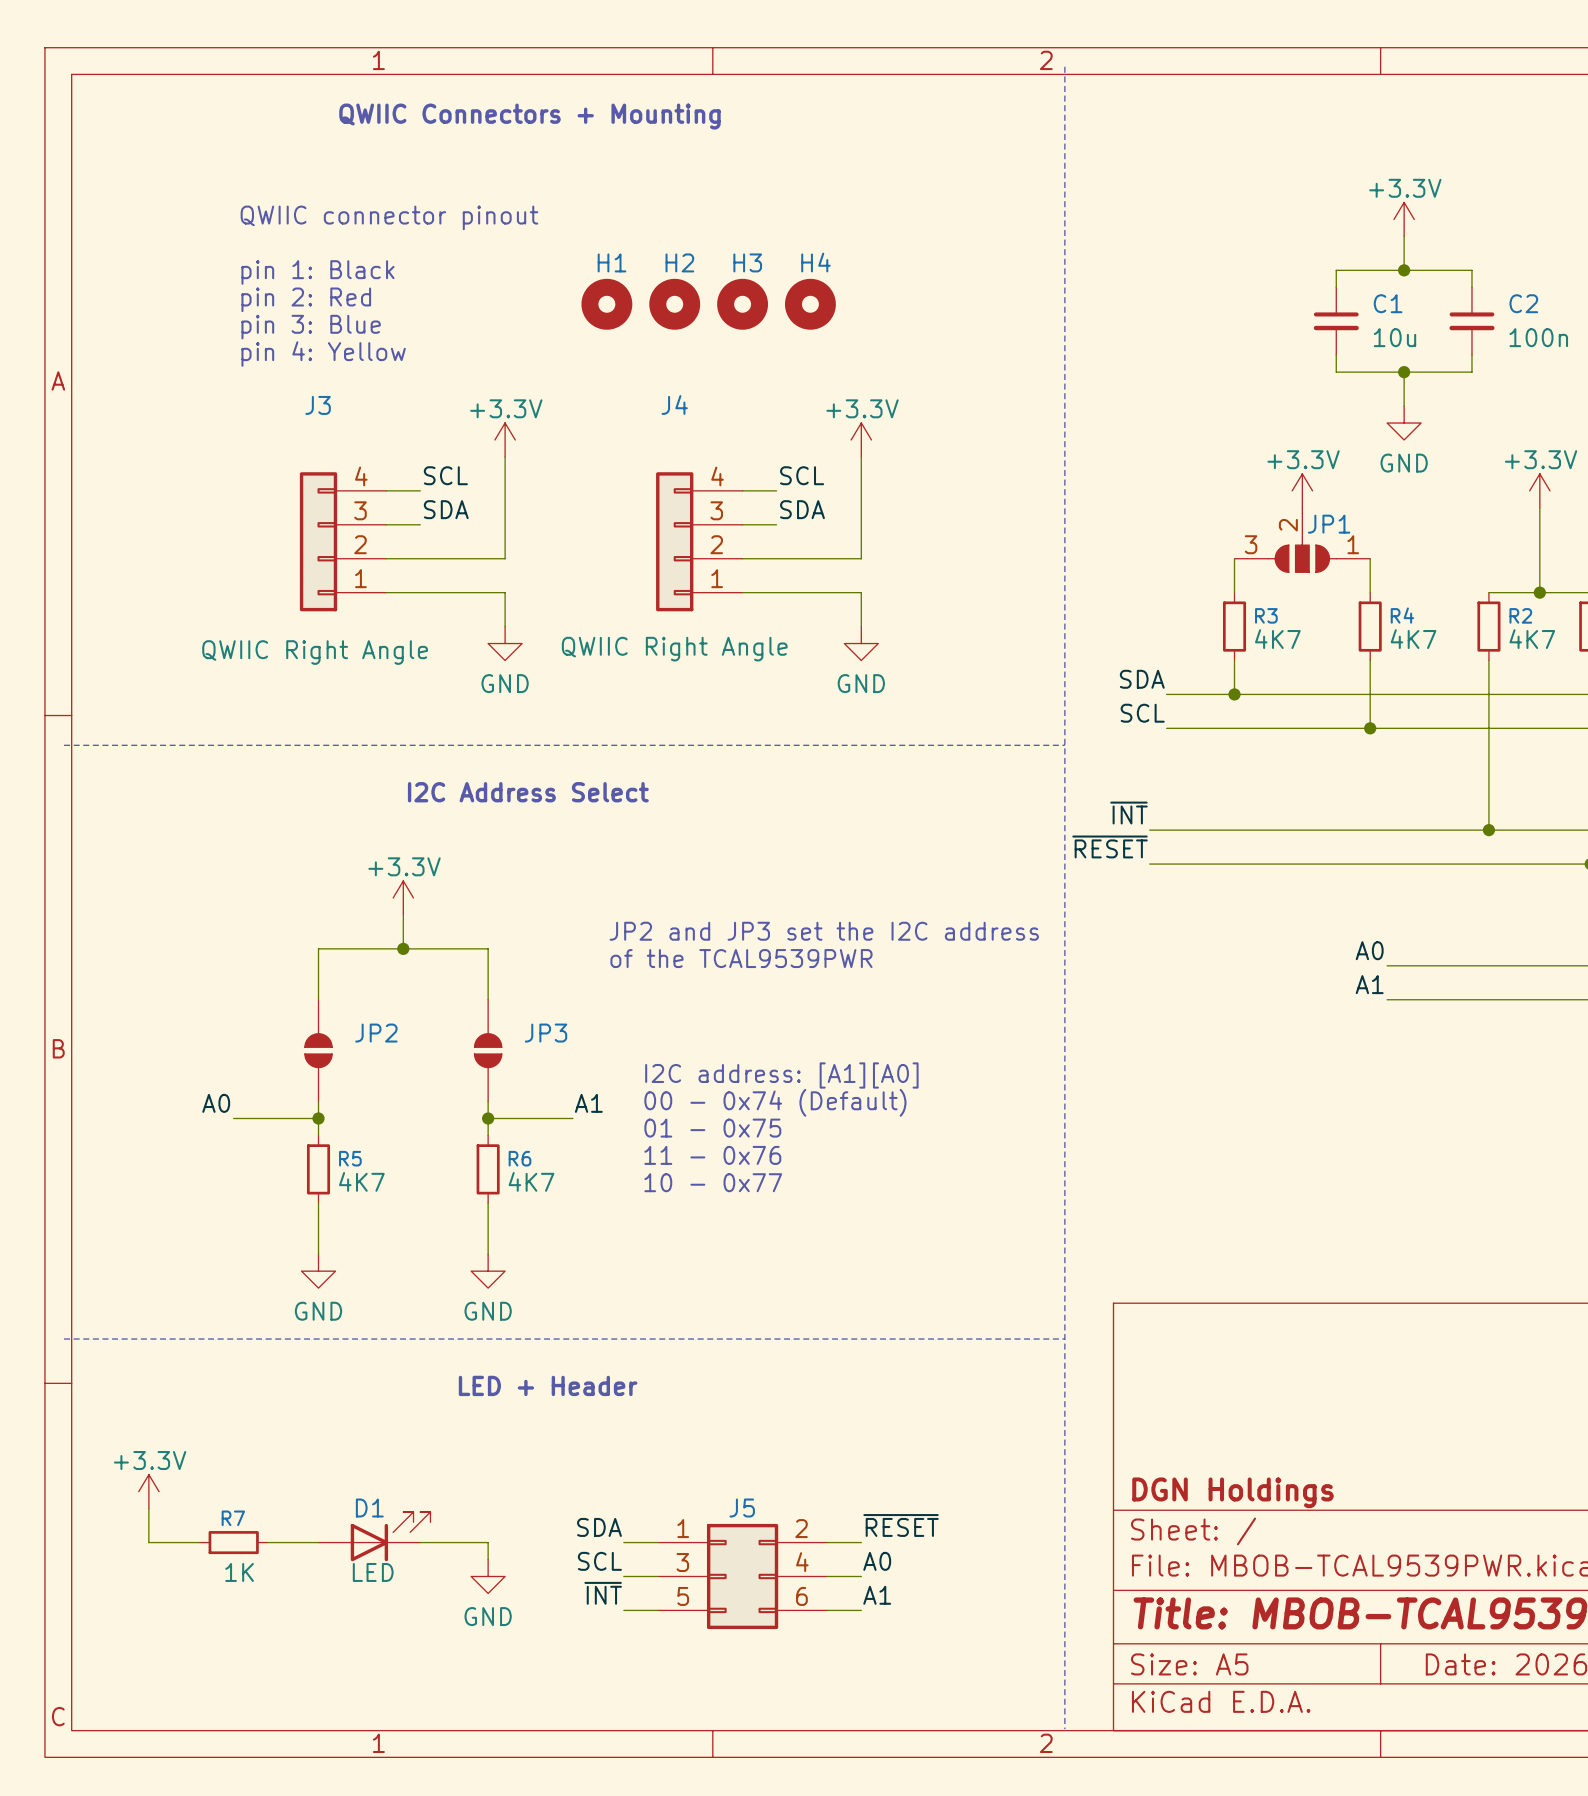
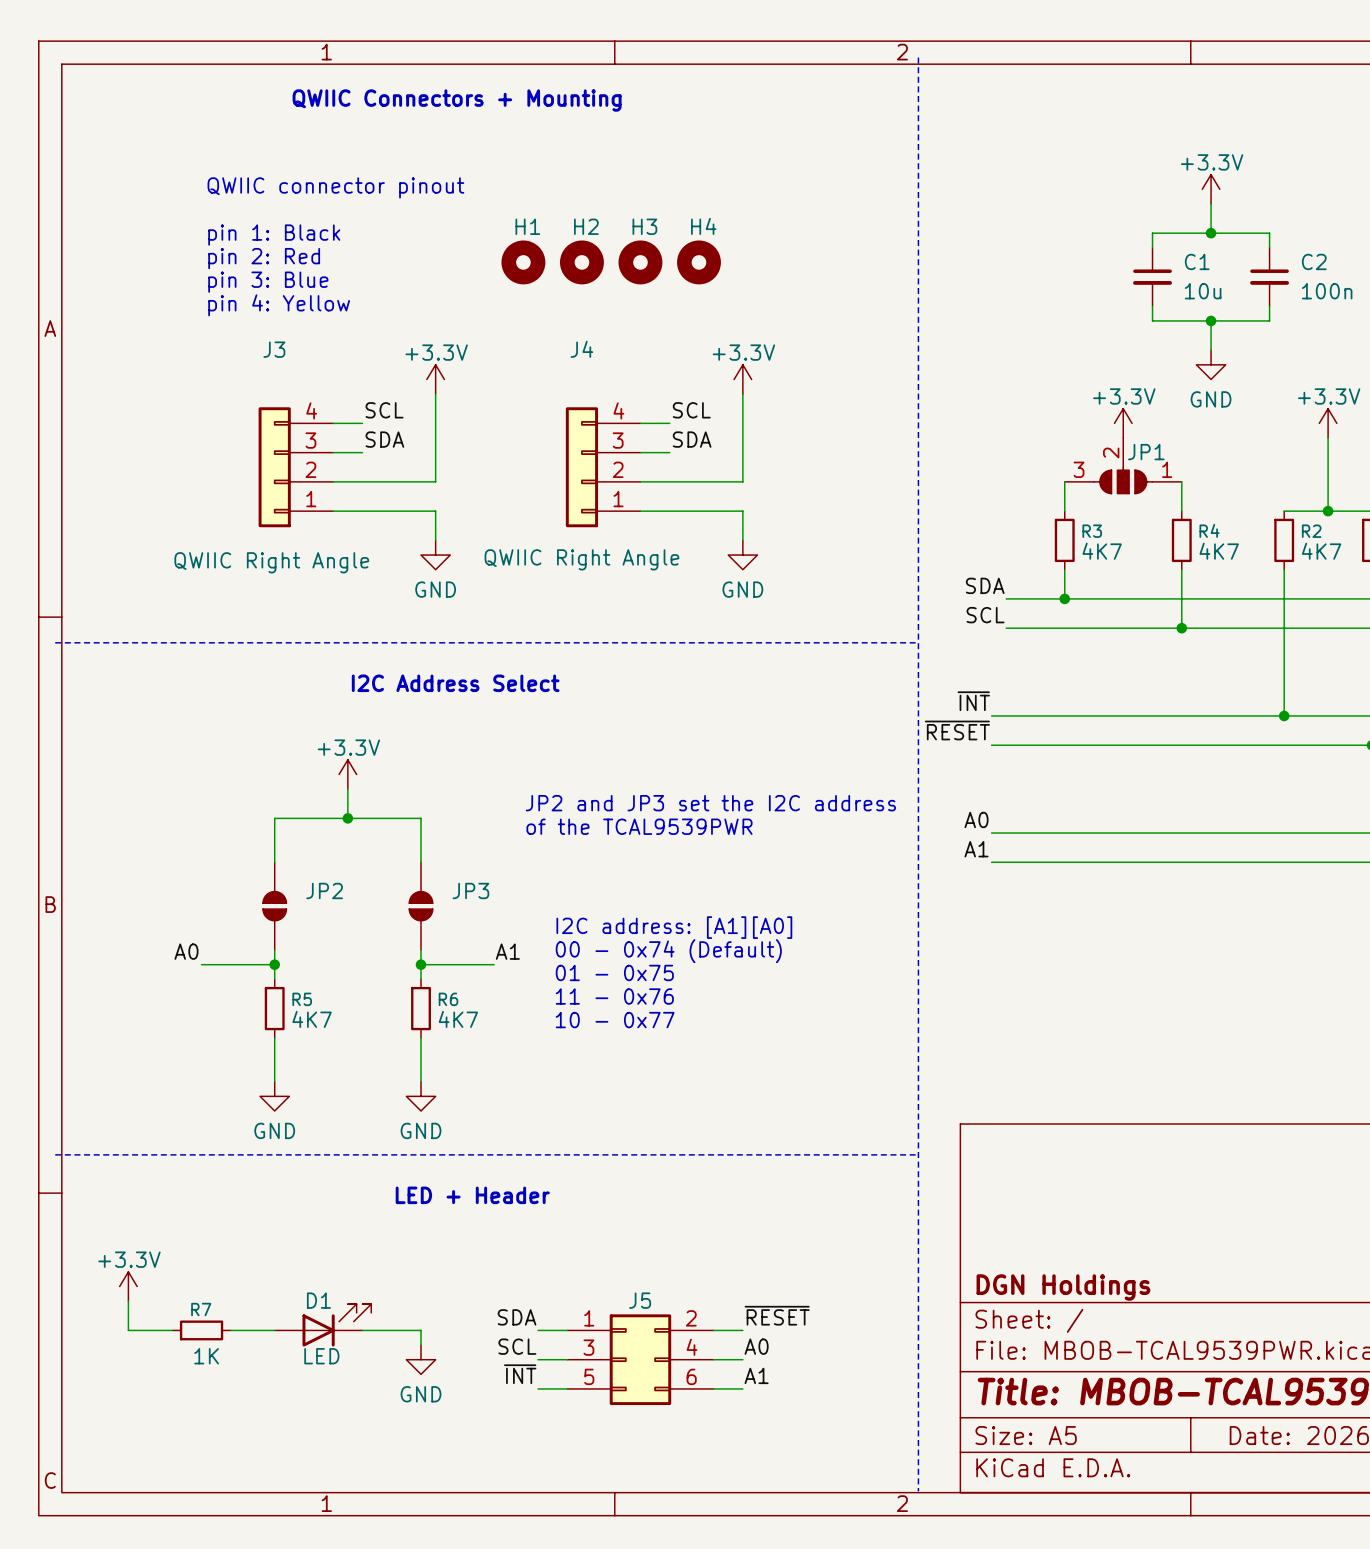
label position: A0 (1369, 950) -> A0 (976, 819)
wire: none -> (991, 833) (1196, 833)
label position: A1 (1369, 984) -> A1 (976, 849)
wire: none -> (991, 862) (1196, 862)

